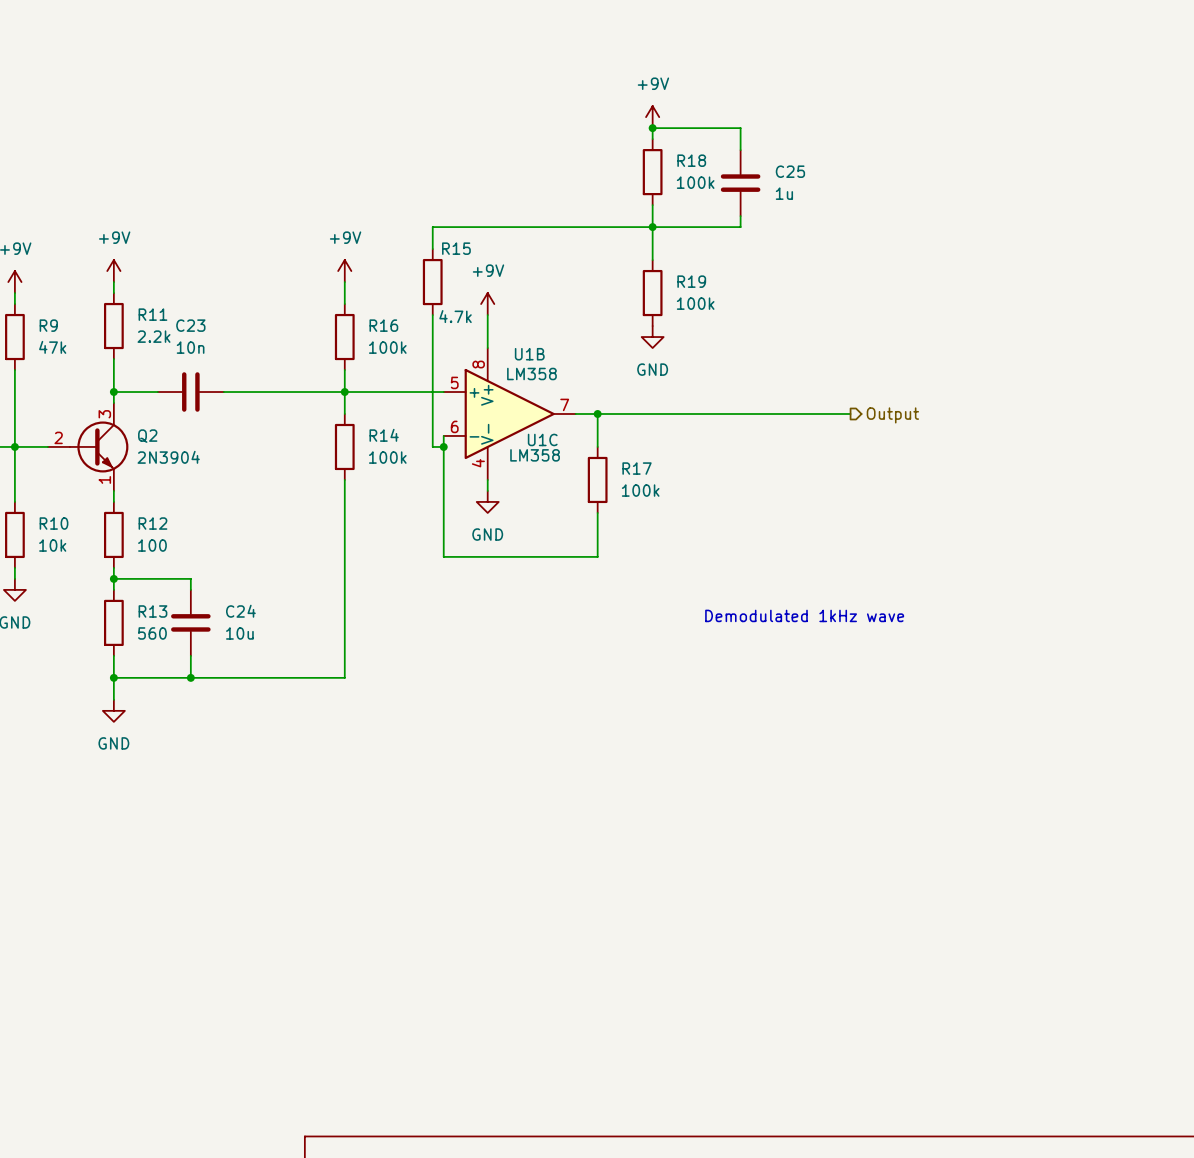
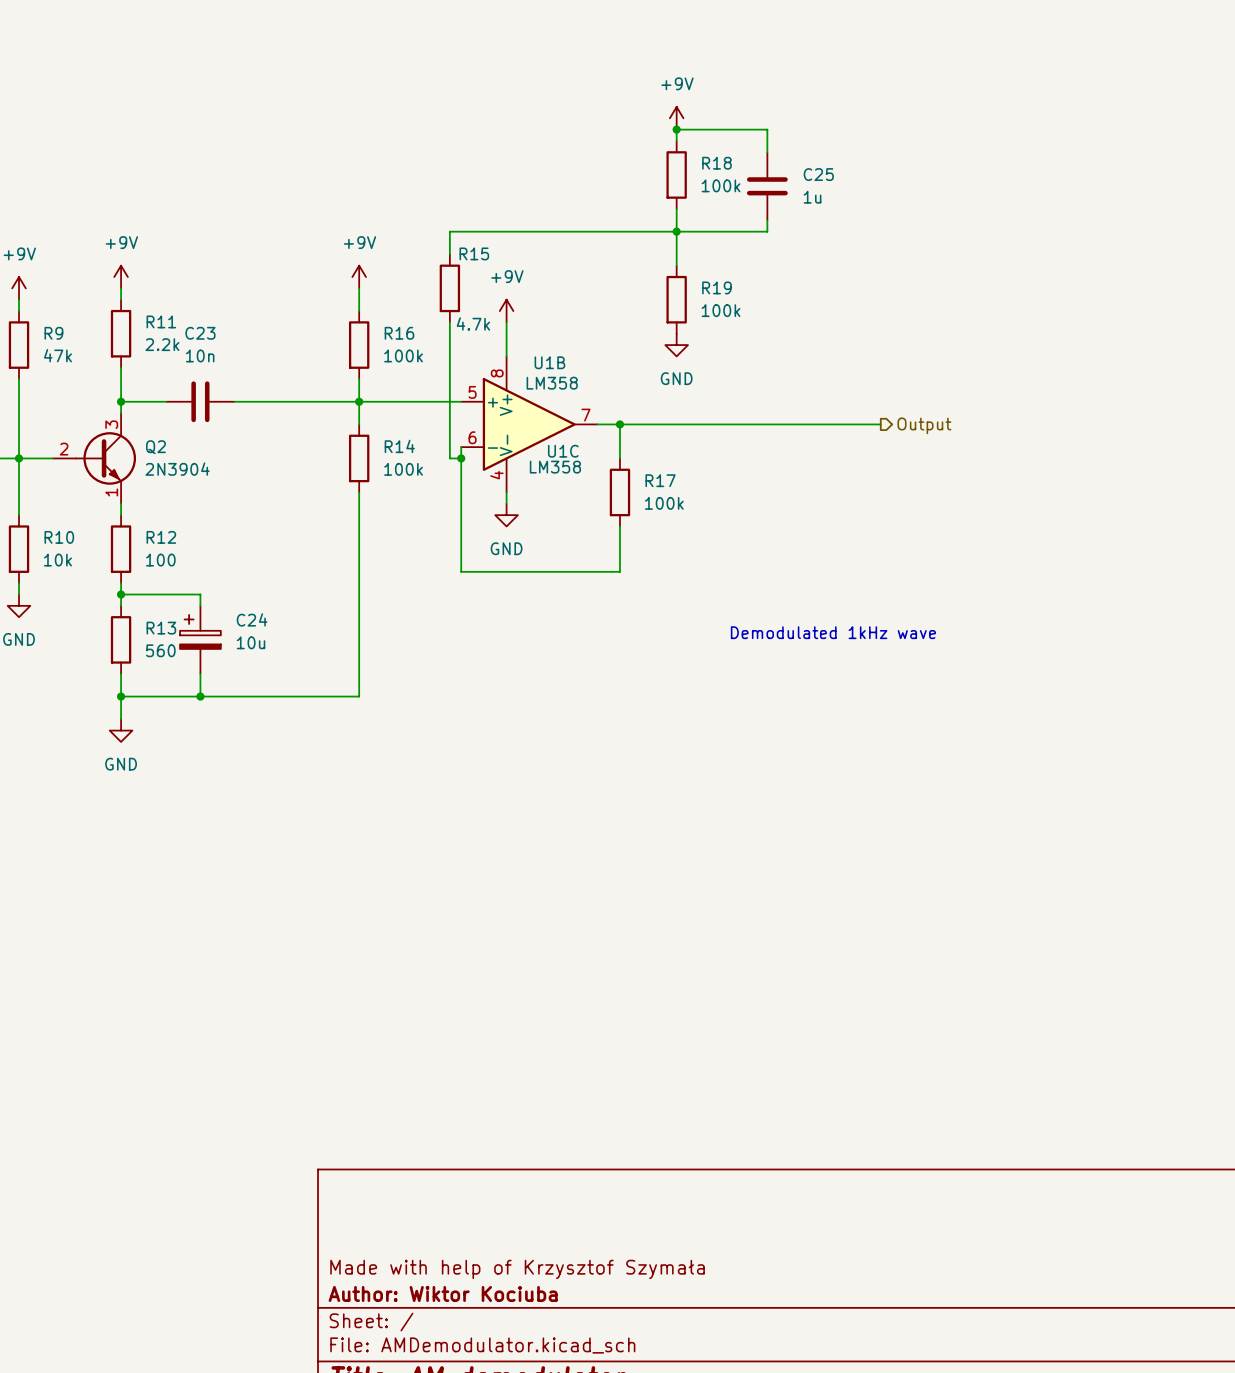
C24 symbol: [171, 589, 211, 656] -> [180, 605, 221, 674]

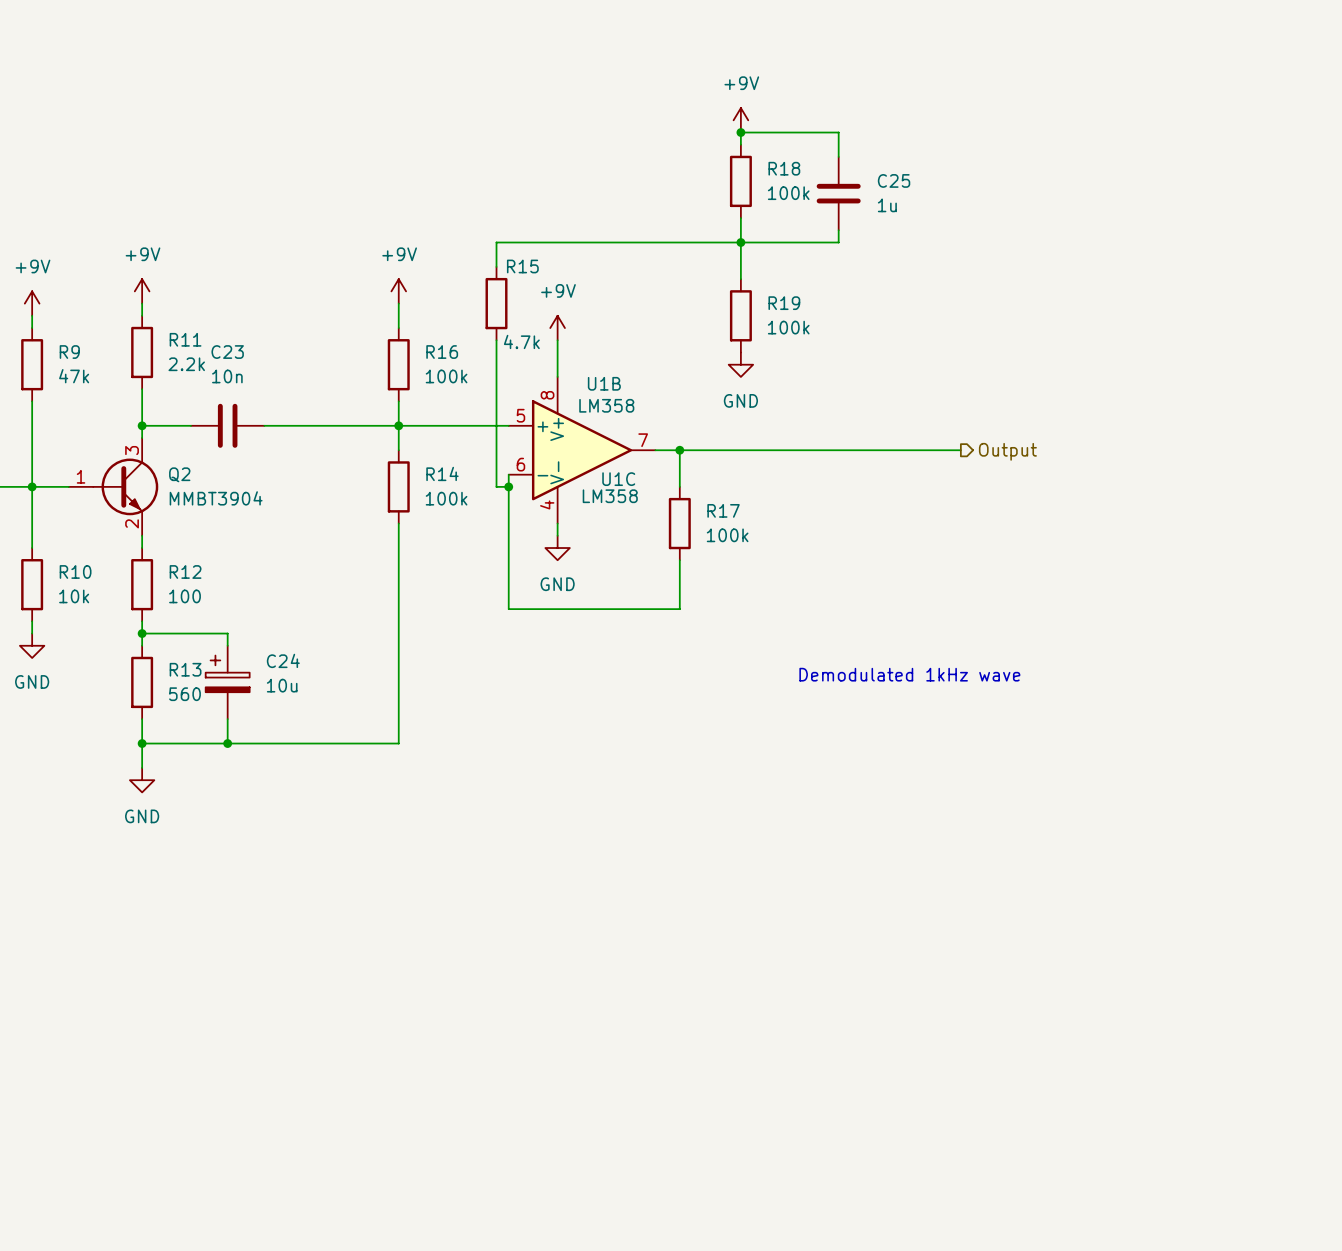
Q2 pin number: 2 (64, 449) -> 1 (81, 476)
Q2 value: 2N3904 (177, 469) -> MMBT3904 (216, 498)
Q2 pin number: 1 (111, 492) -> 2 (132, 523)

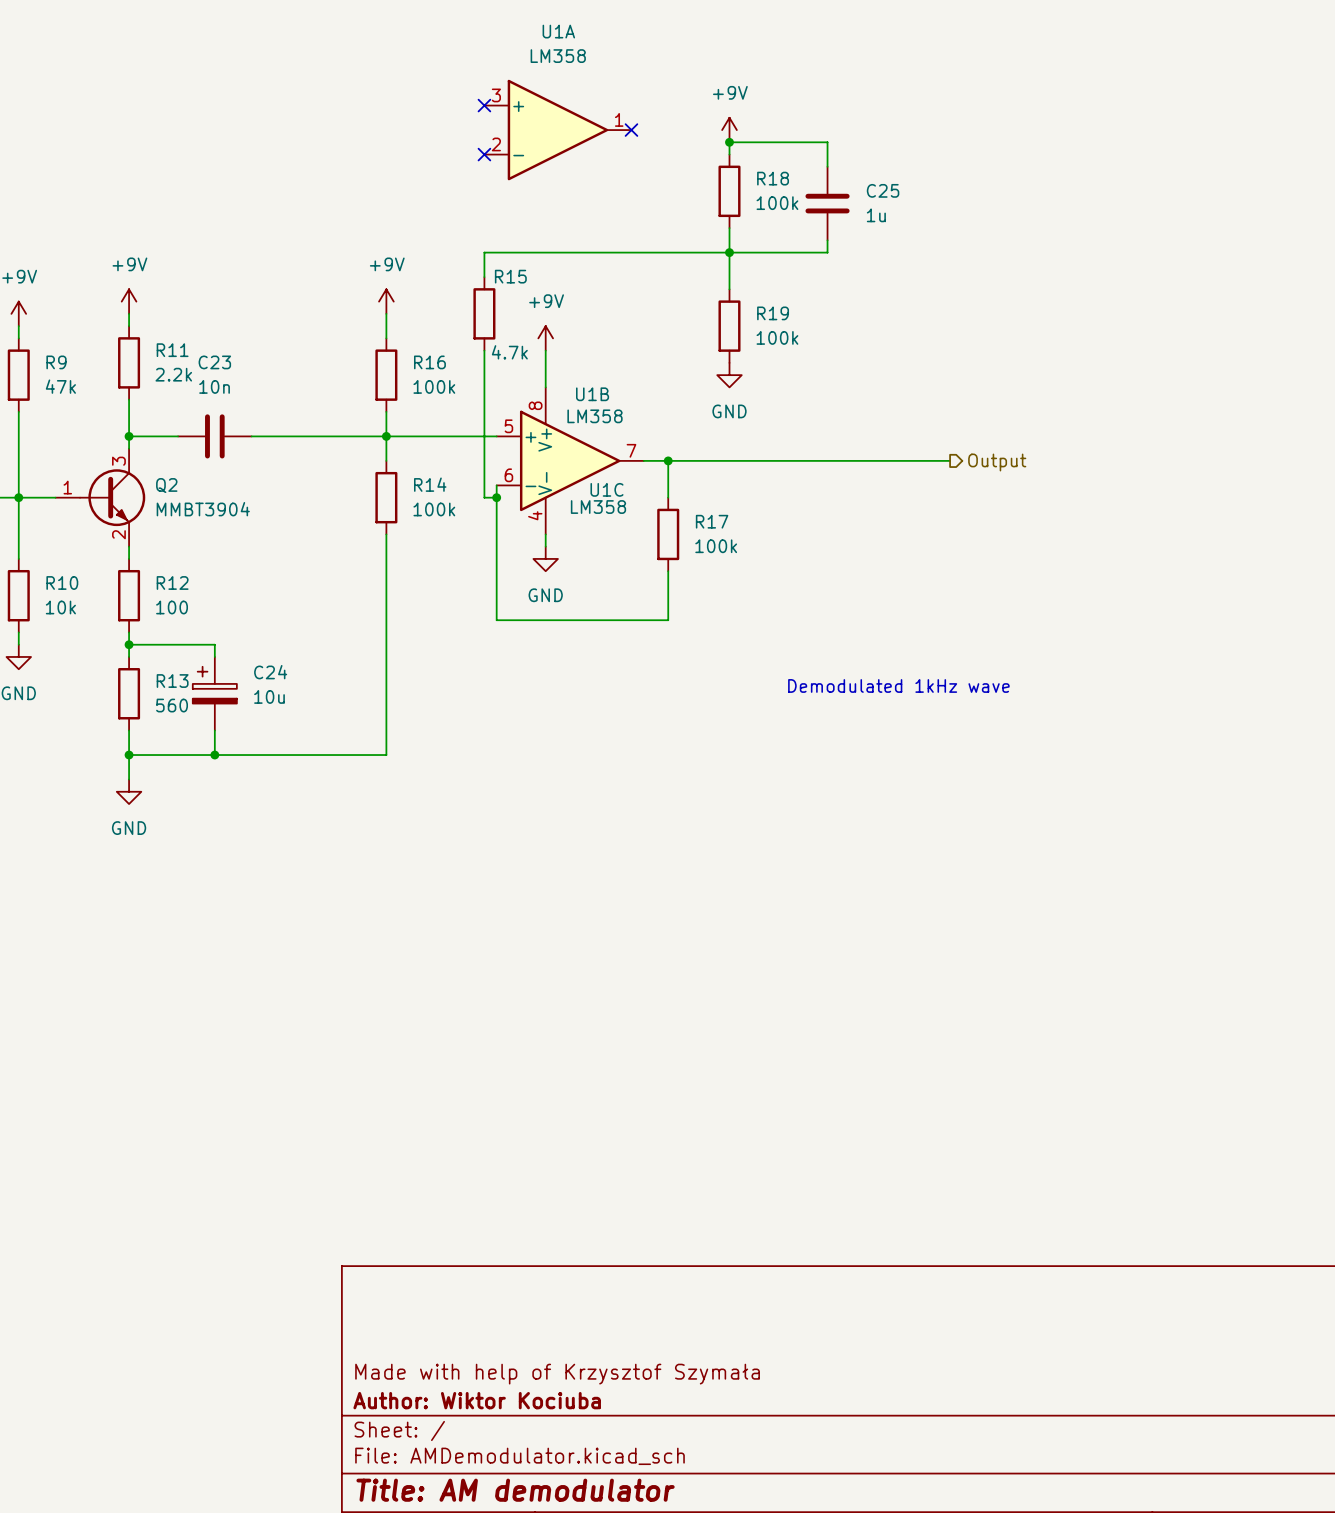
no-connect mark: none -> (484, 105)
U1A: none -> LM358 (557, 130)
no-connect mark: none -> (631, 130)
no-connect mark: none -> (484, 154)

